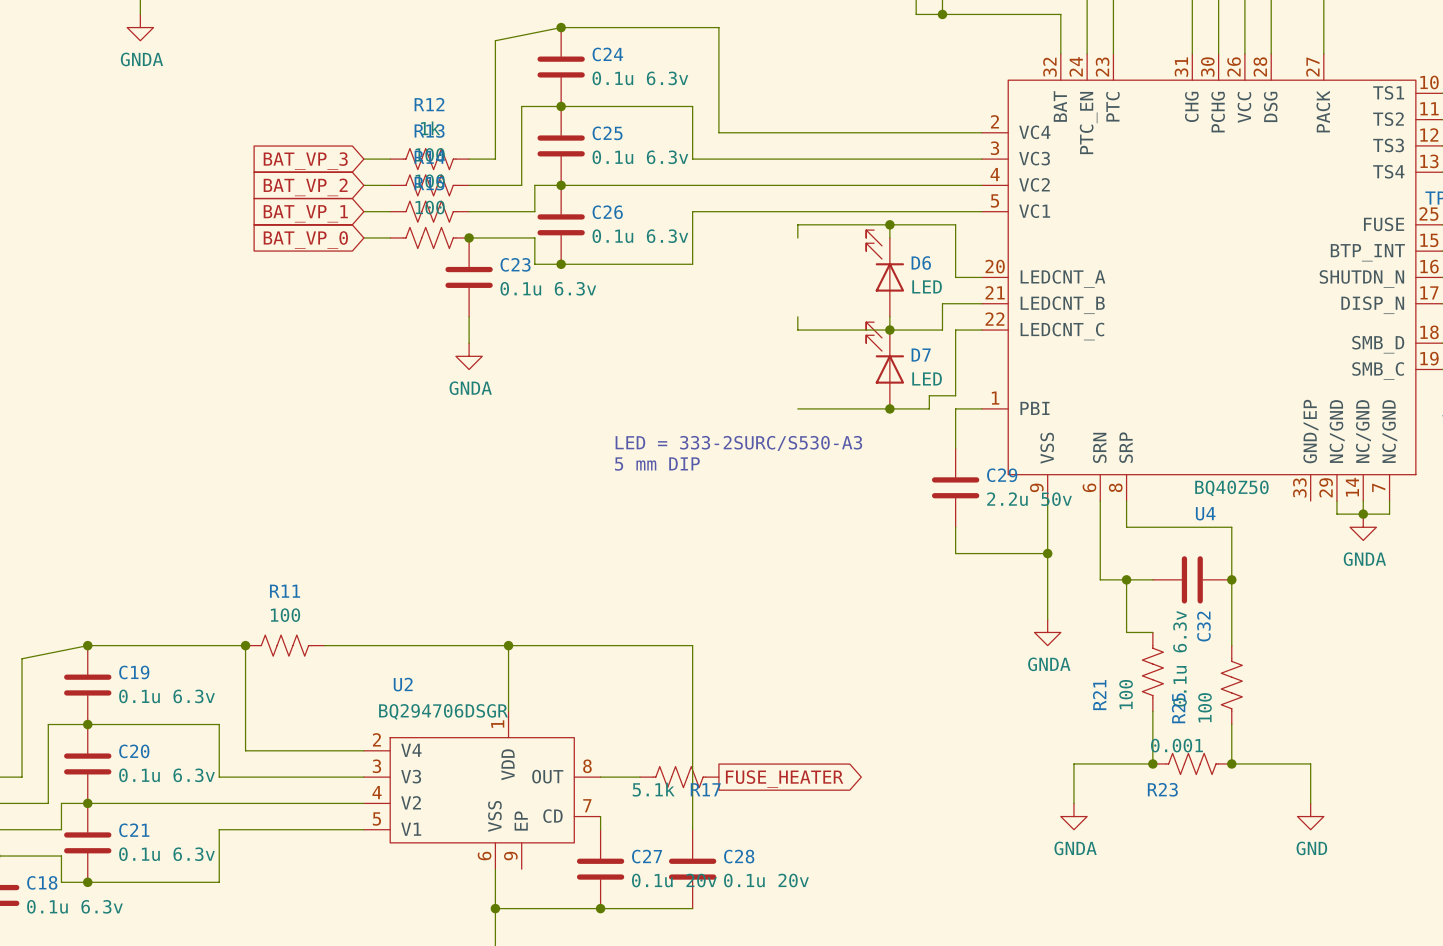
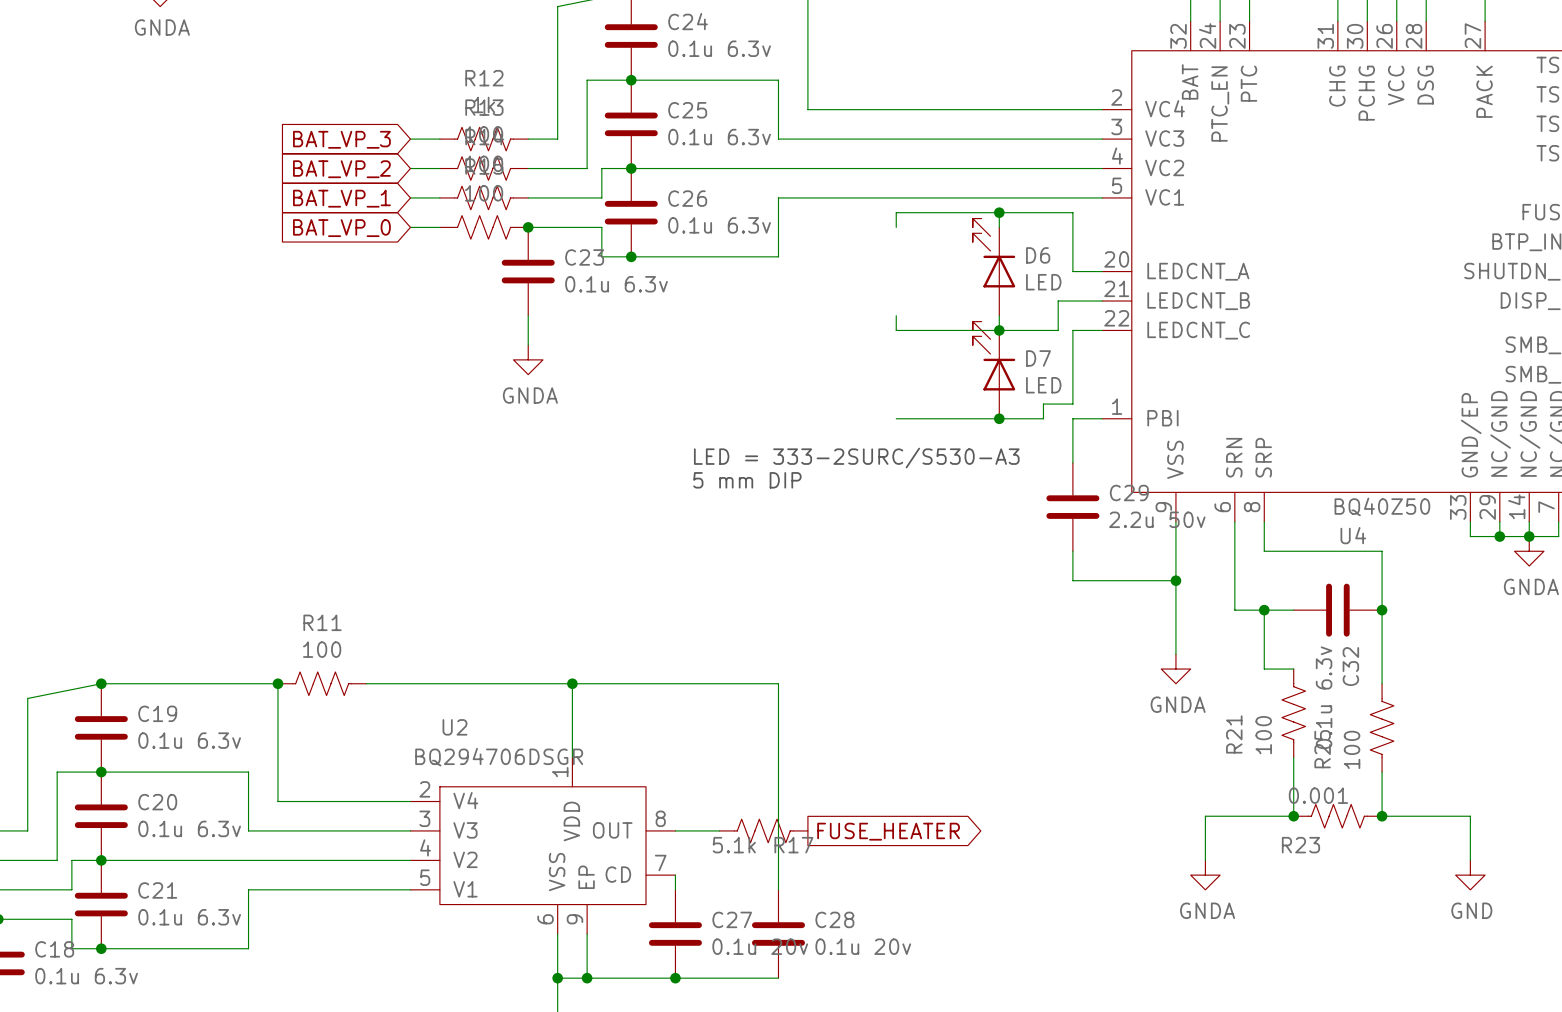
wire: none -> (1470, 521) (1470, 536) (1499, 536)
junction: none -> (1499, 536)
wire: none -> (587, 934) (587, 978)
junction: none -> (587, 978)

